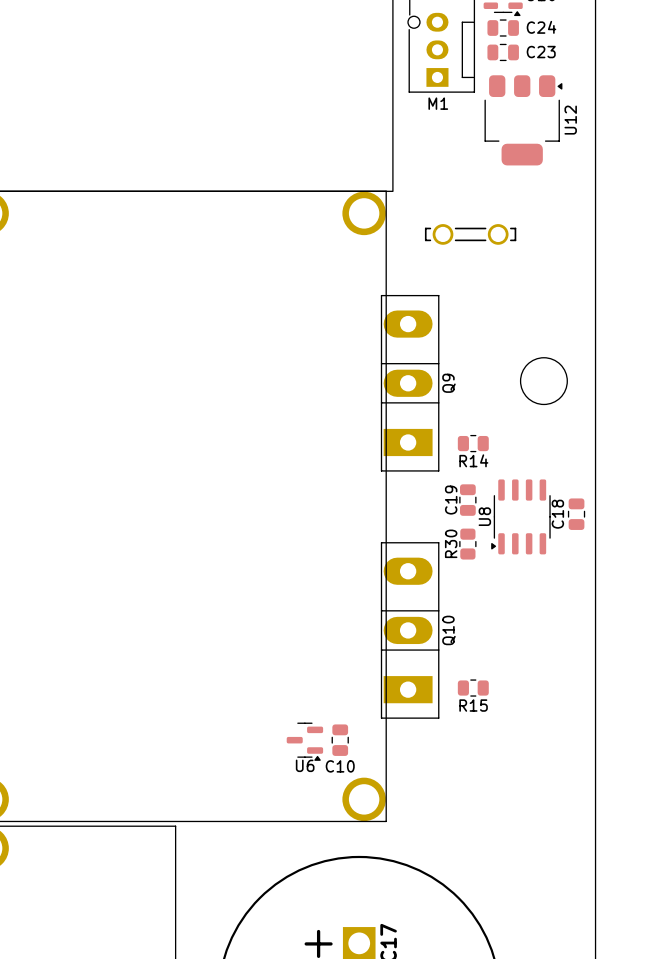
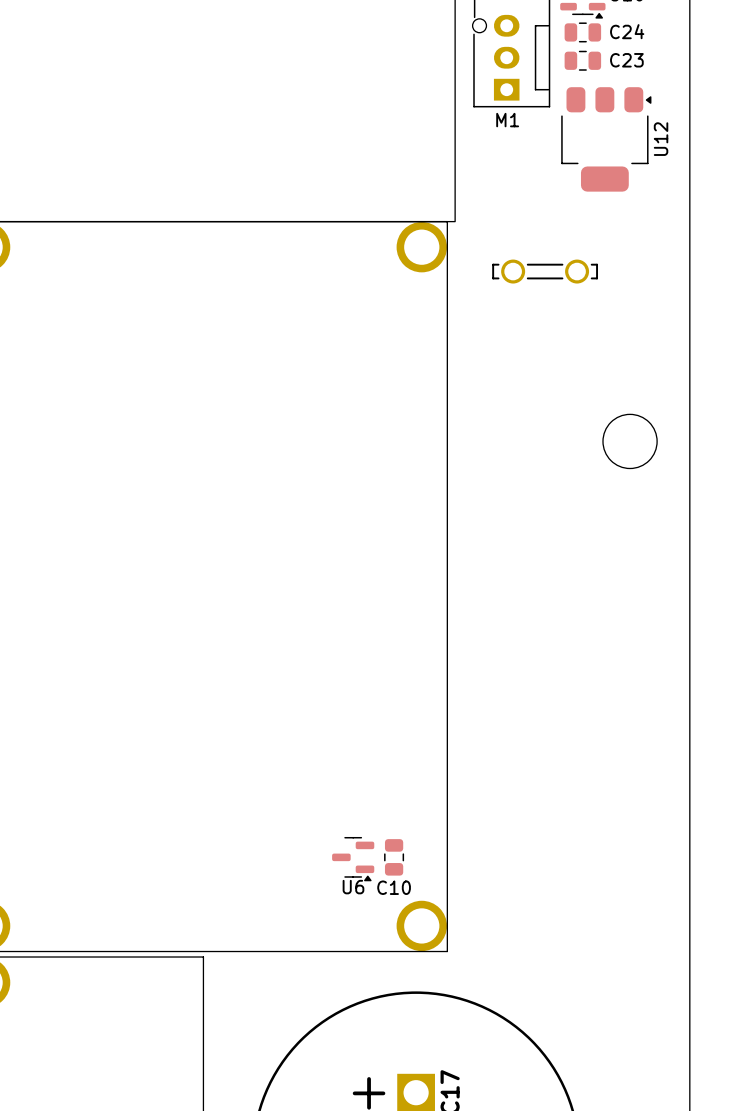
Q9: (410, 383) -> none
R14: (473, 443) -> none
C19: (467, 500) -> none
C18: (576, 514) -> none
U8: (520, 516) -> none
R30: (467, 544) -> none
Q10: (410, 630) -> none
R15: (473, 688) -> none

